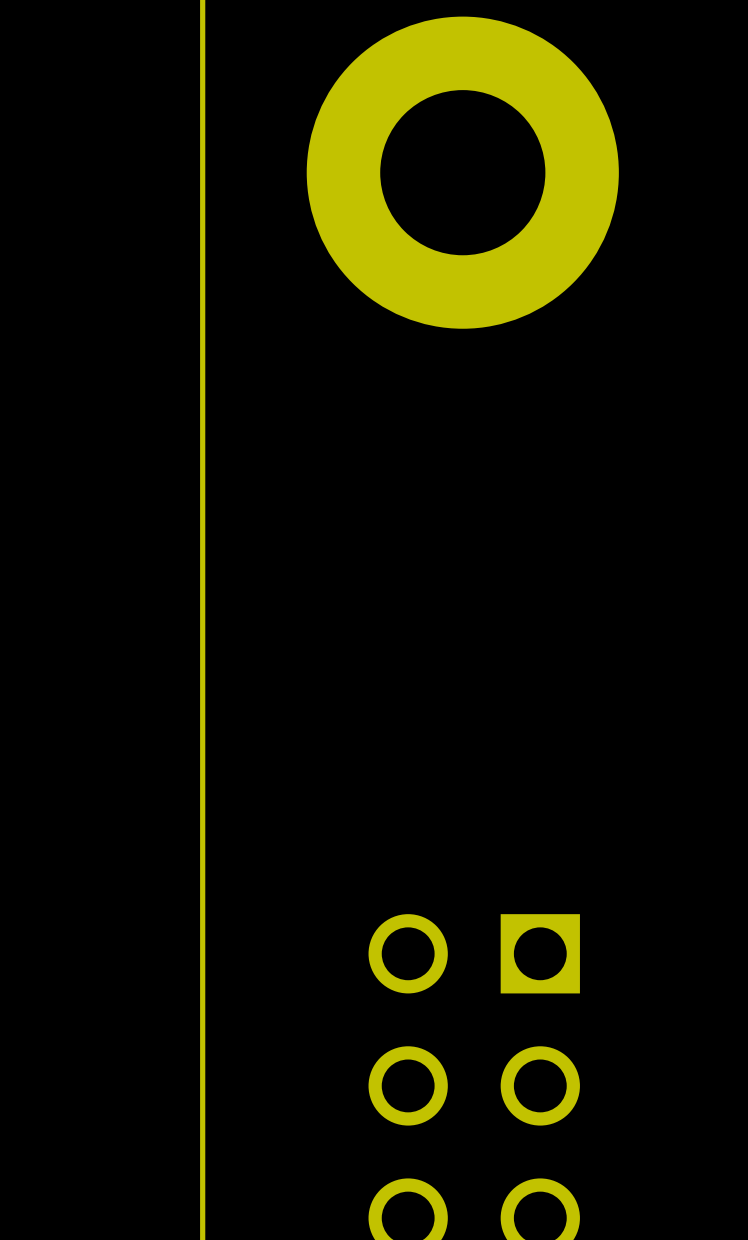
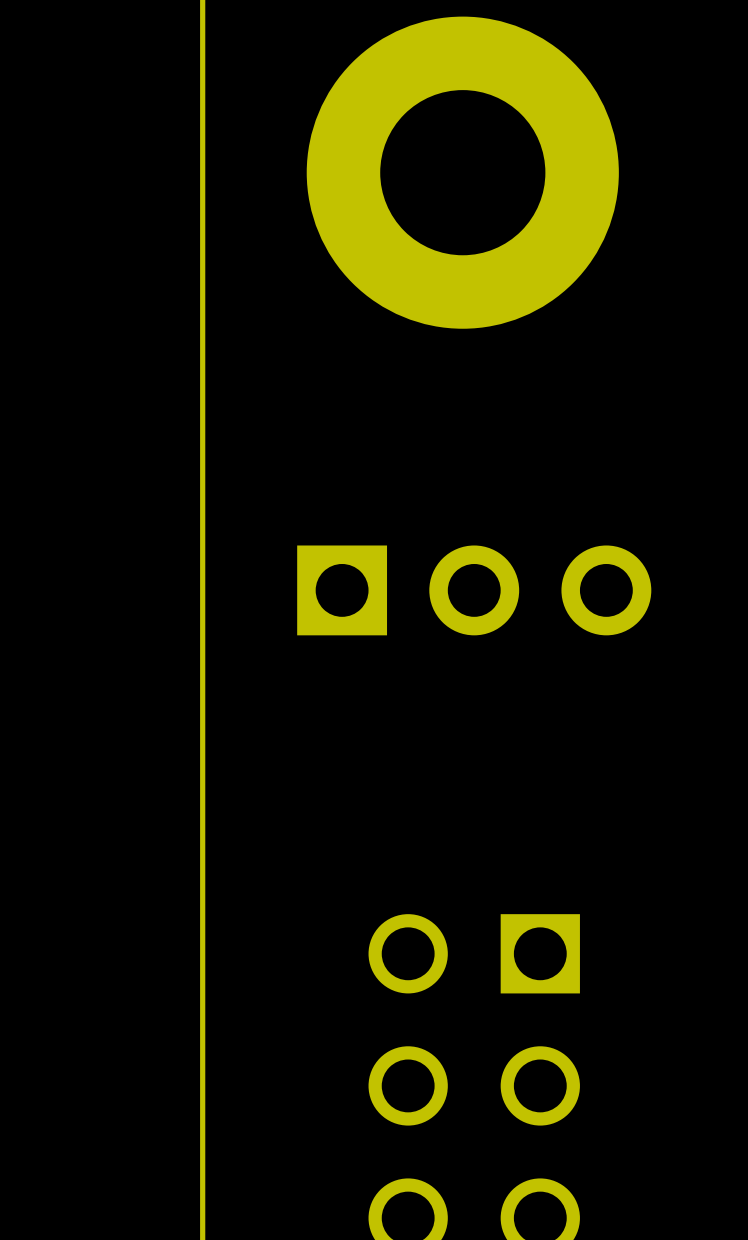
part: none -> (474, 590)

